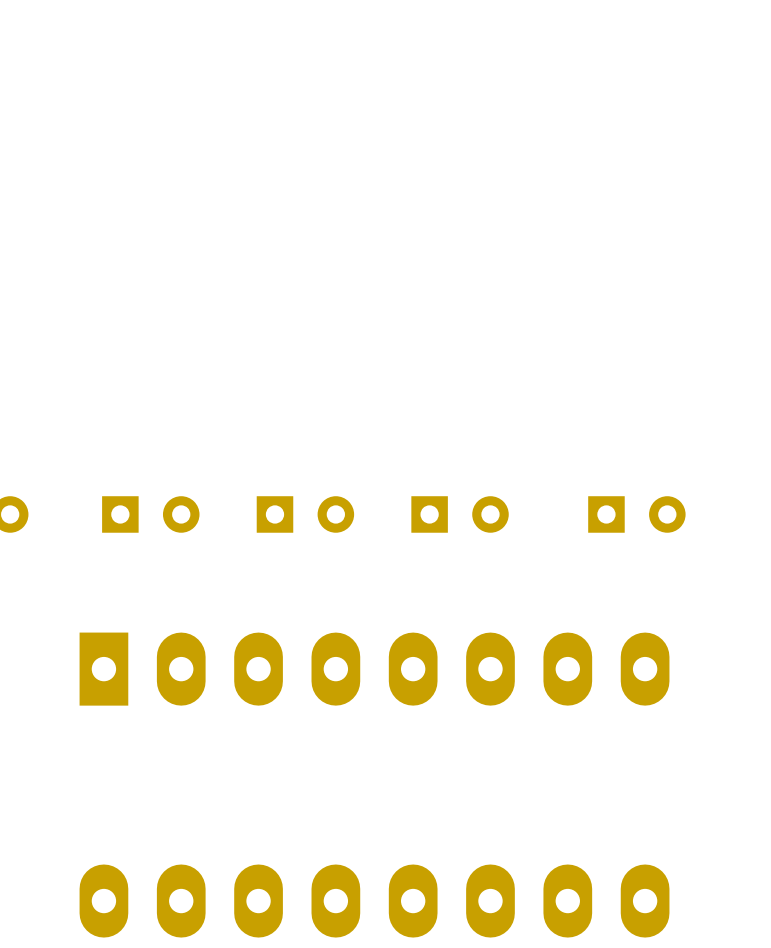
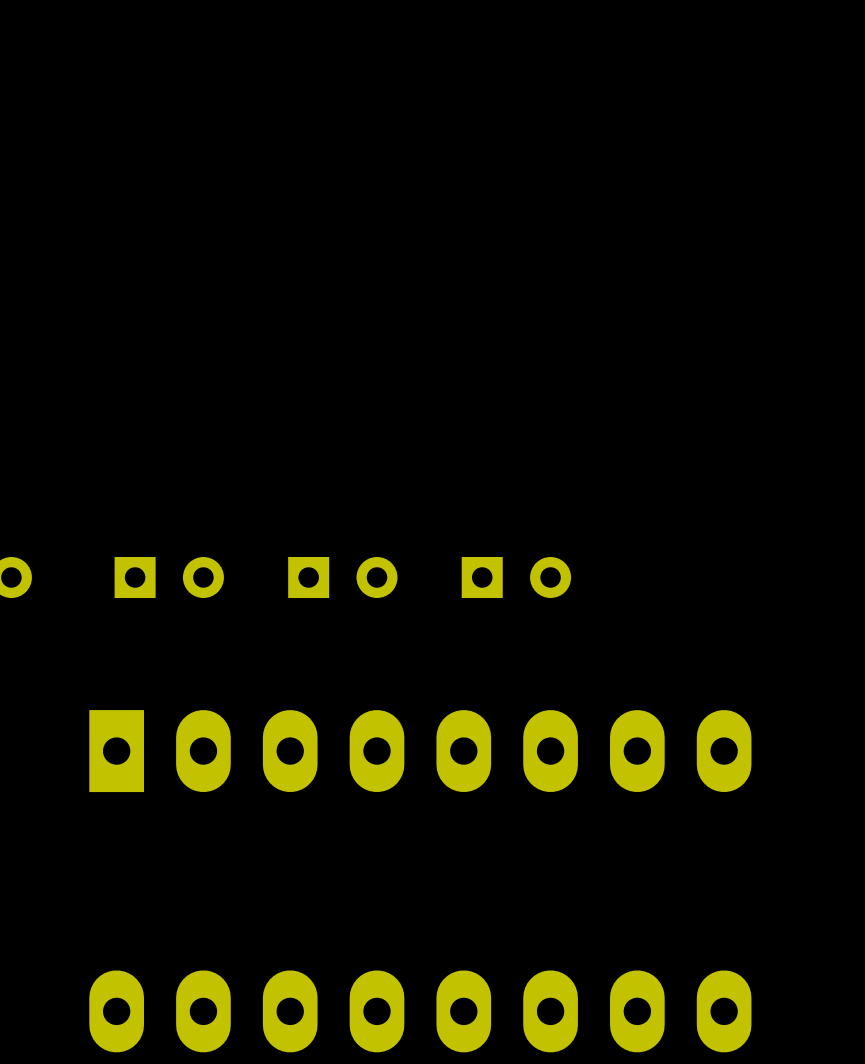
part: (636, 514) -> none

